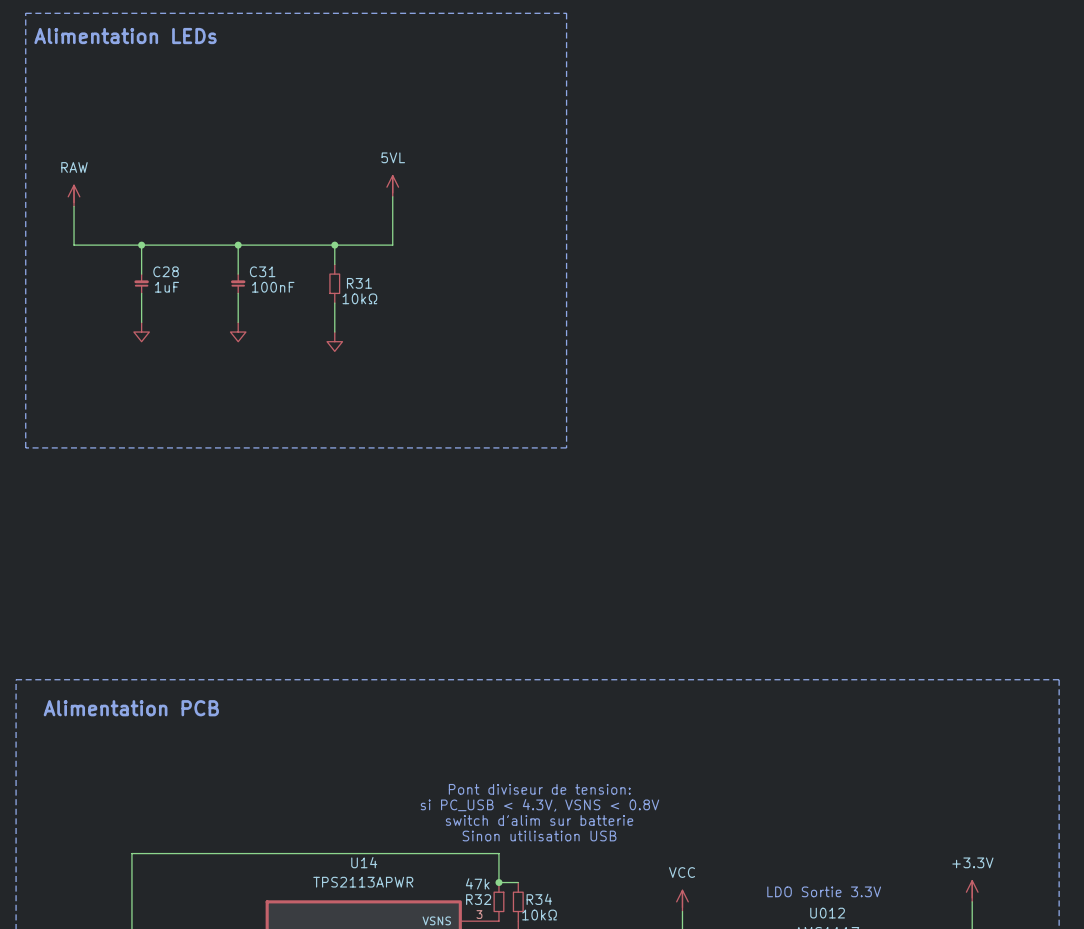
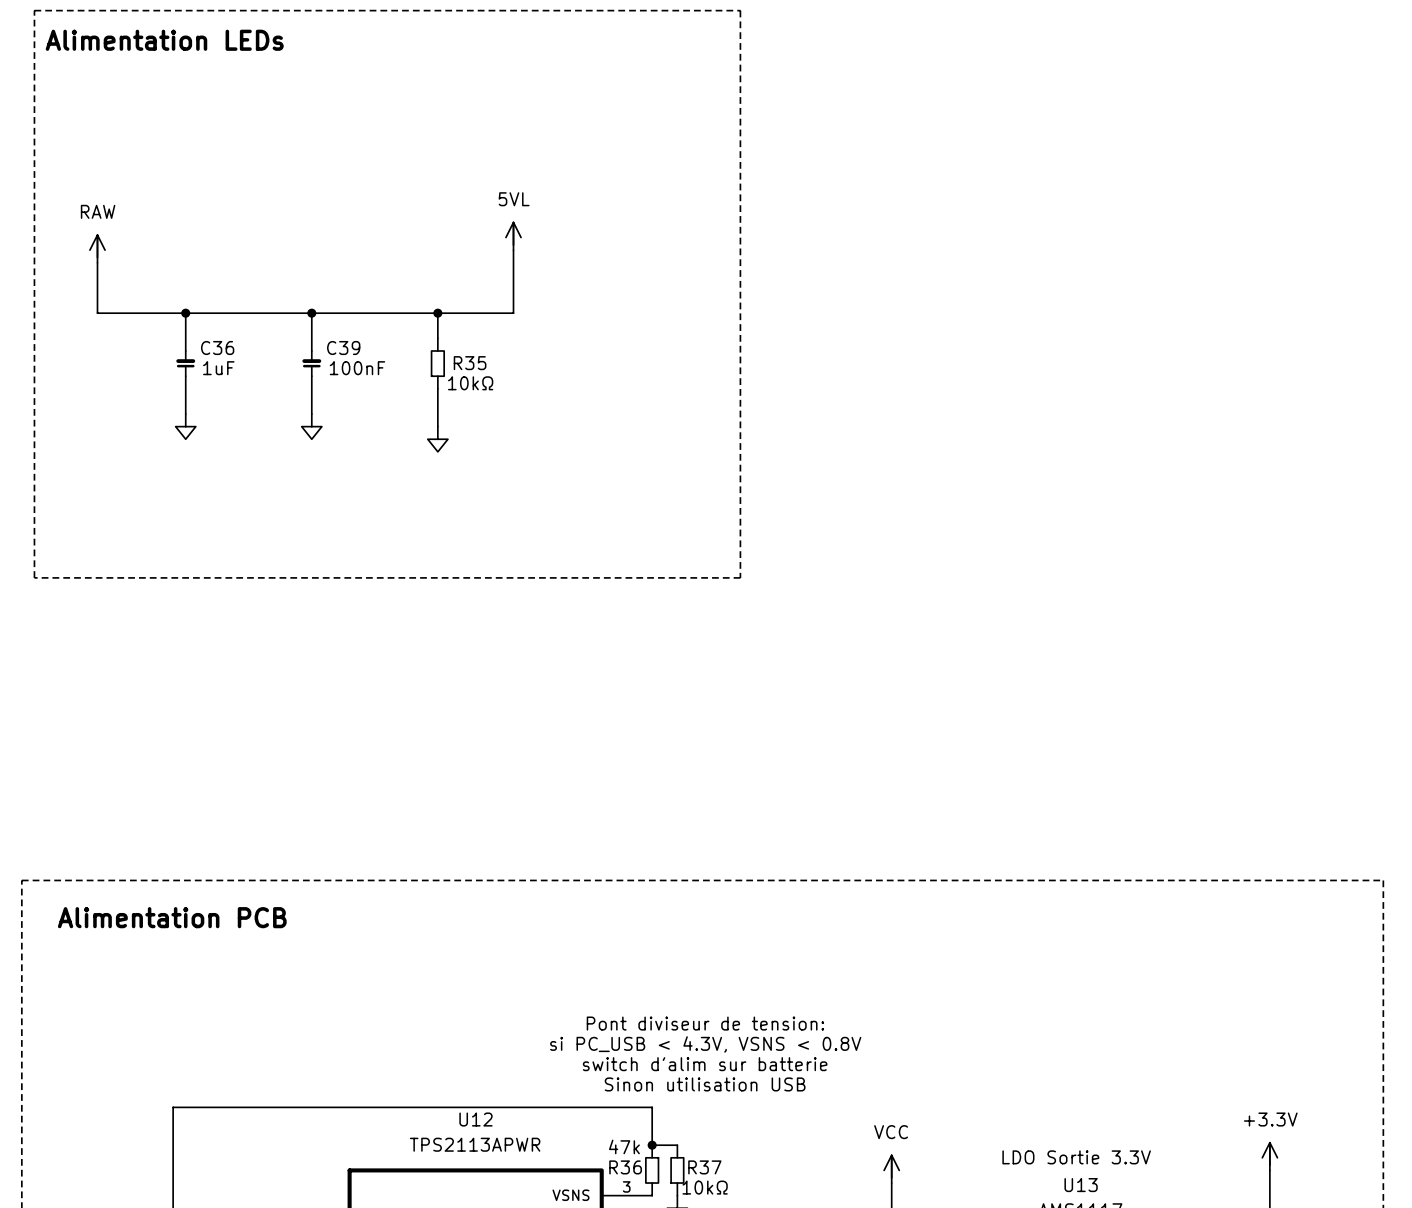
C28 name: C28 (166, 271) -> C36 (217, 348)
C31 name: C31 (262, 271) -> C39 (343, 348)
R31 name: R31 (359, 283) -> R35 (470, 363)
U14 name: U14 (364, 862) -> U12 (475, 1119)
R32 name: R32 (478, 899) -> R36 (625, 1167)
R34 name: R34 (539, 899) -> R37 (704, 1167)
U012 name: U012 (827, 913) -> U13 (1081, 1185)

